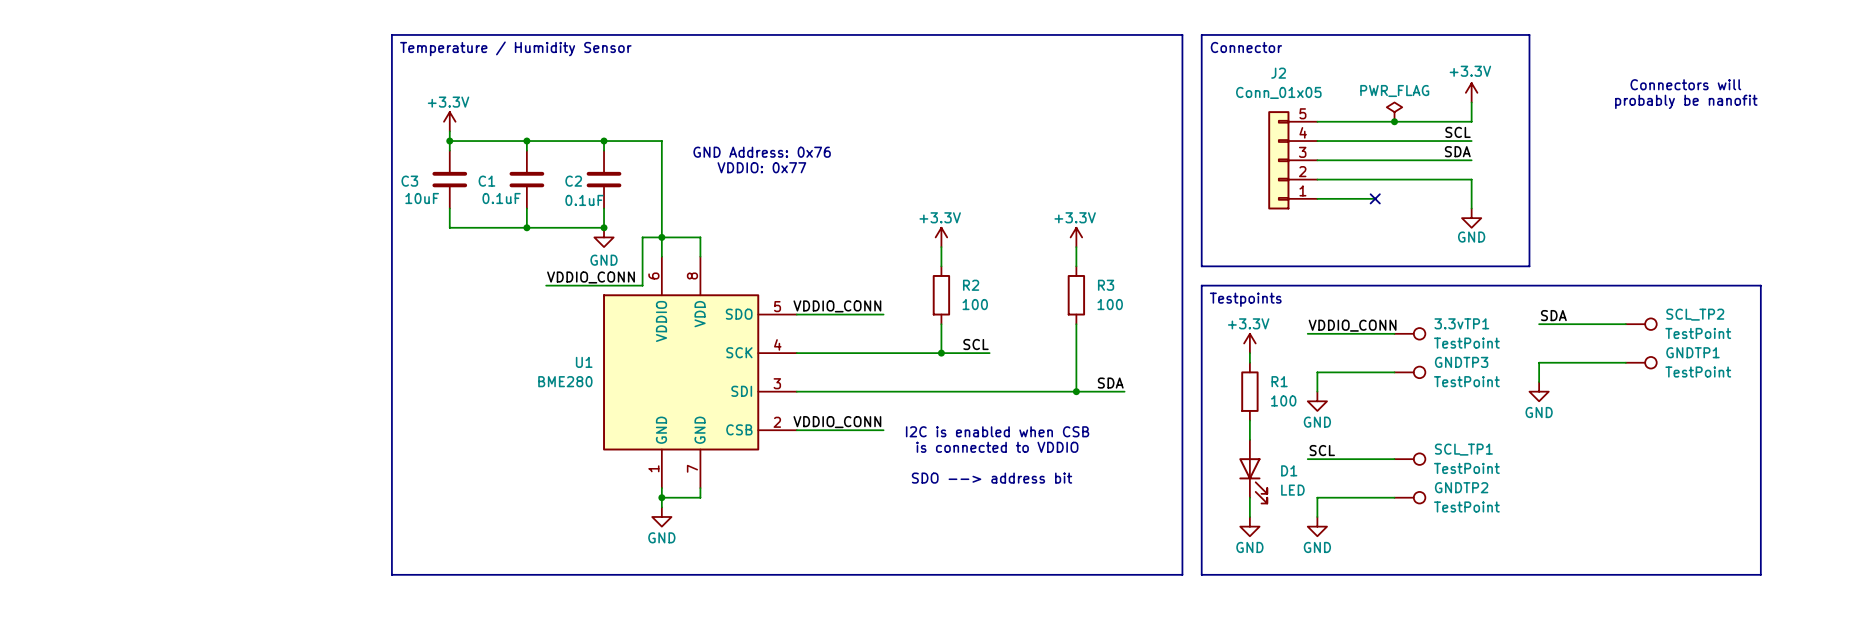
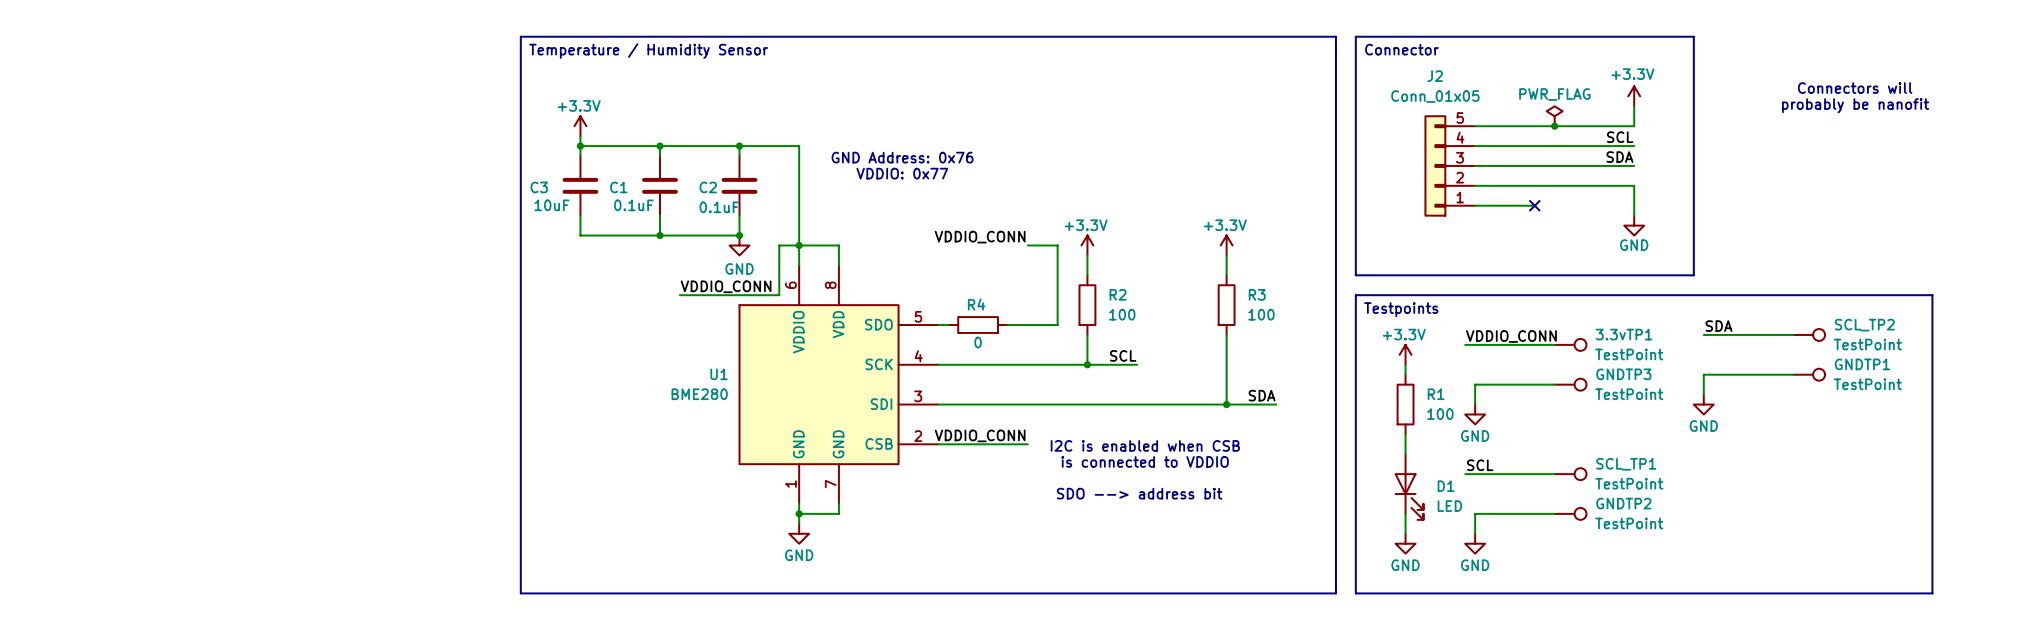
wire: none -> (1027, 245) (1057, 245) (1057, 325) (1027, 325)
label position: VDDIO_CONN (837, 306) -> VDDIO_CONN (980, 237)
wire: (806, 314) (864, 314) -> none
R4: none -> 0 (978, 325)

